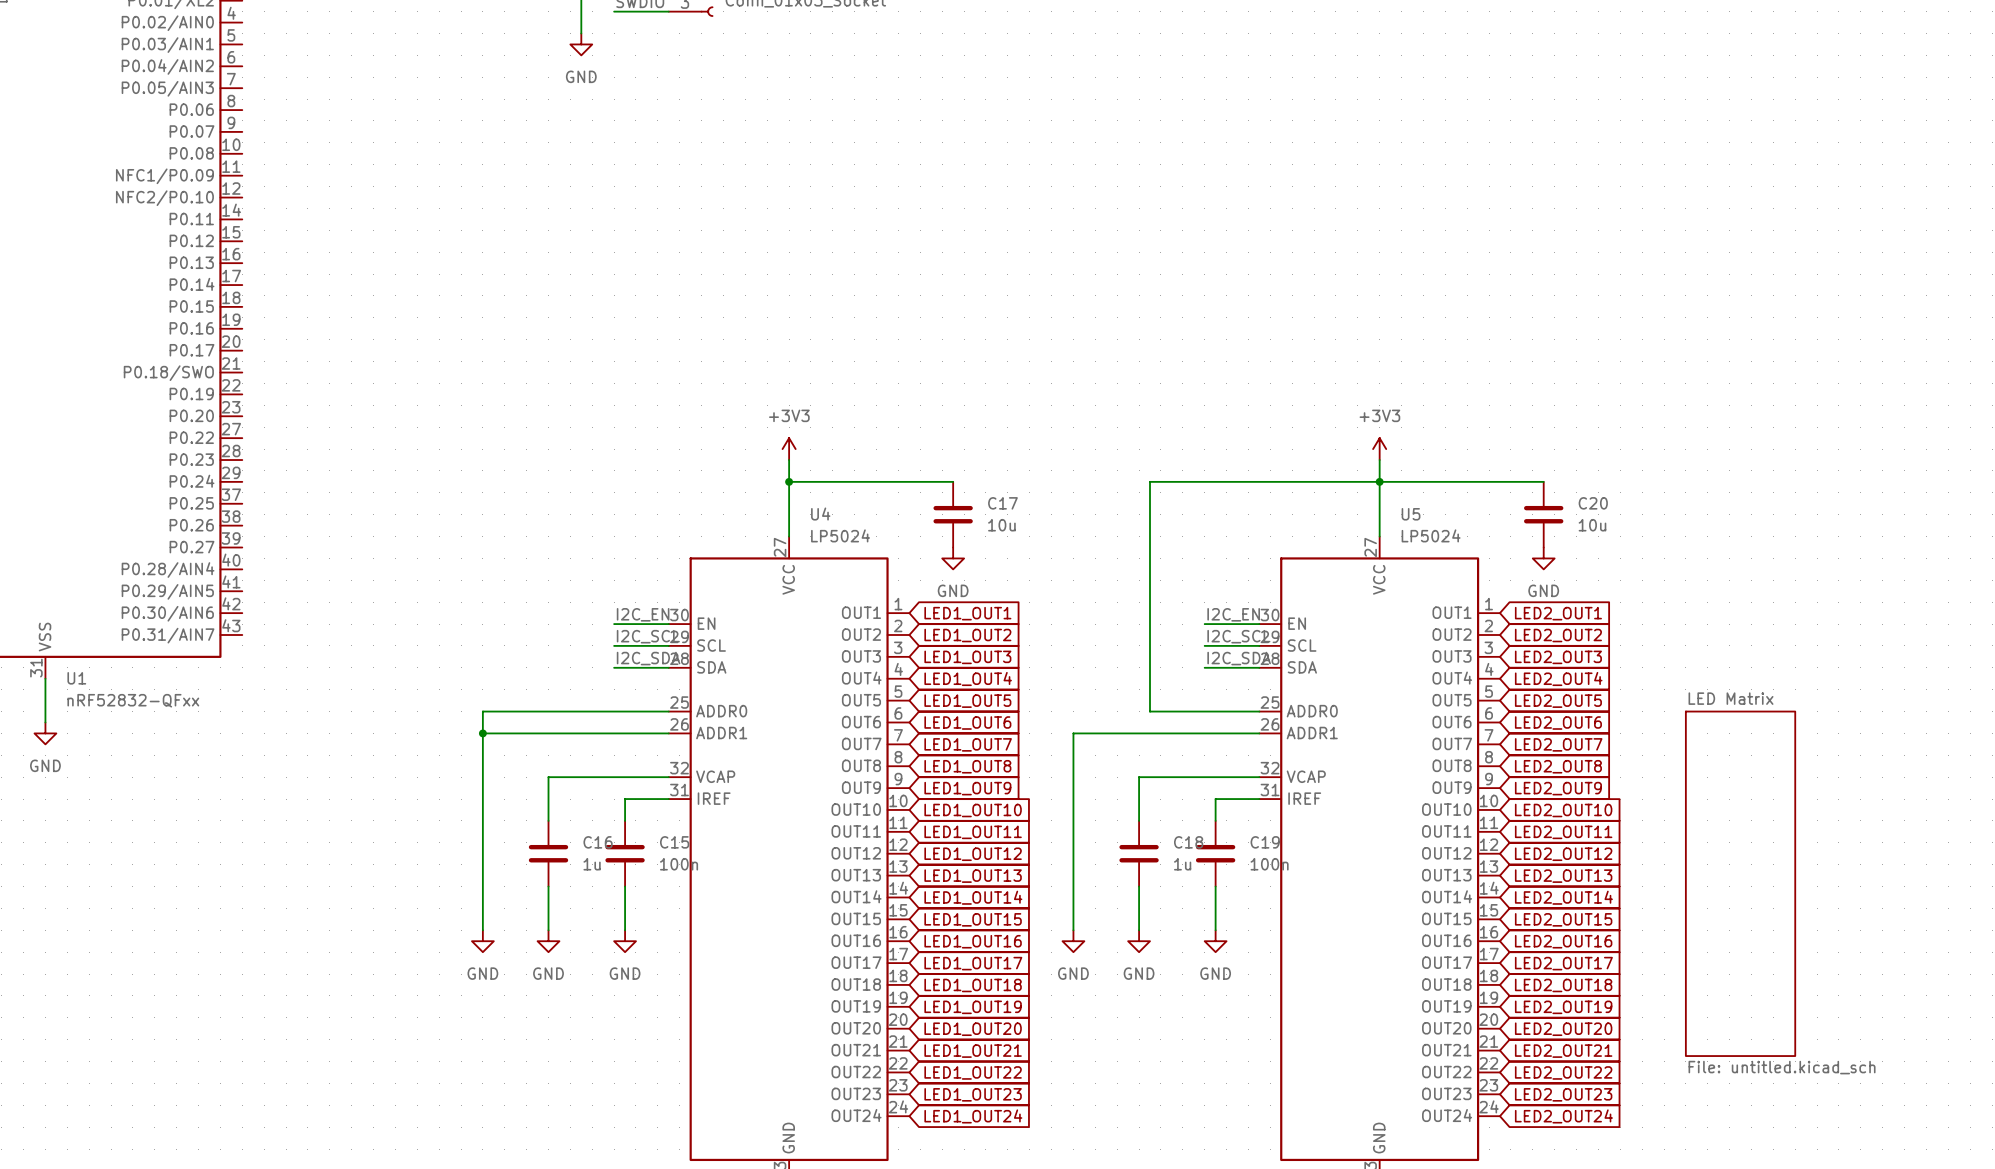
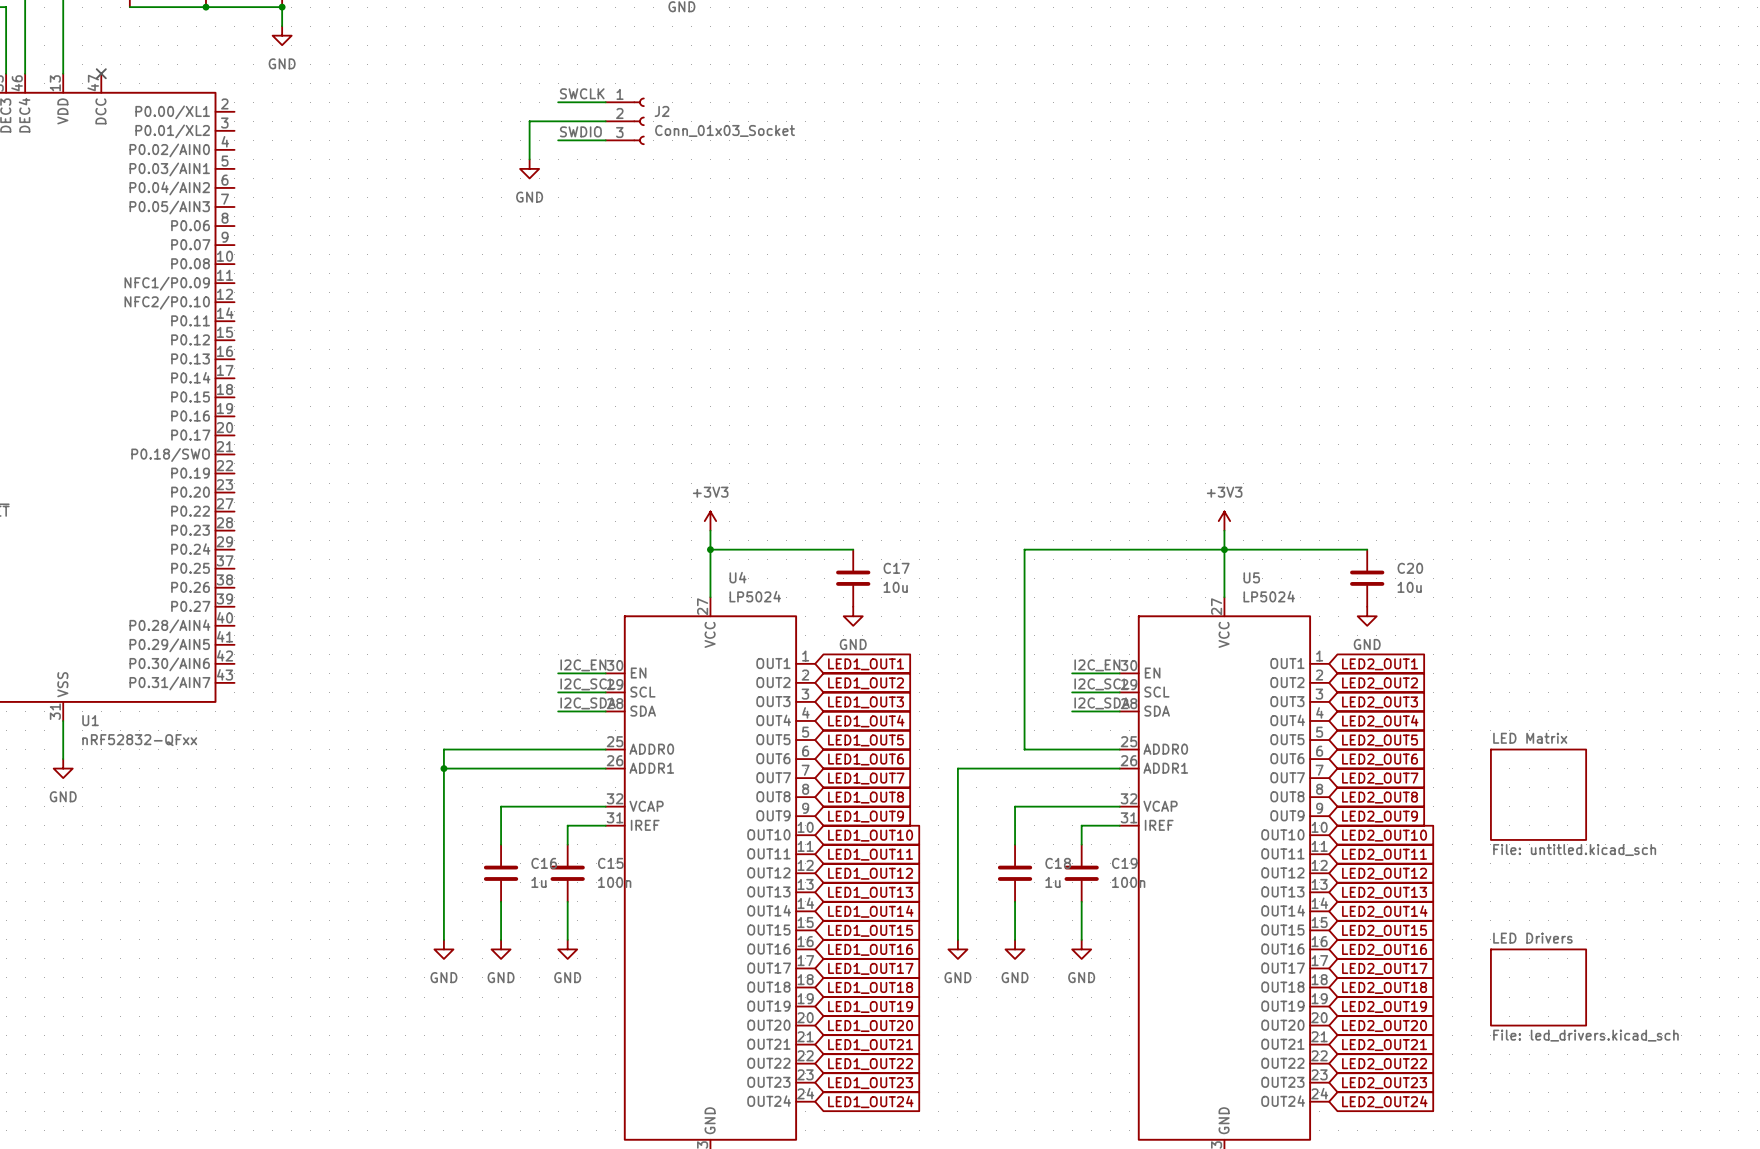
sheet LED Matrix: none -> File: untitled.kicad_sch (1538, 794)
sheet LED Matrix: File: untitled.kicad_sch (1740, 883) -> none
sheet LED Drivers: none -> File: led_drivers.kicad_sch (1538, 987)

